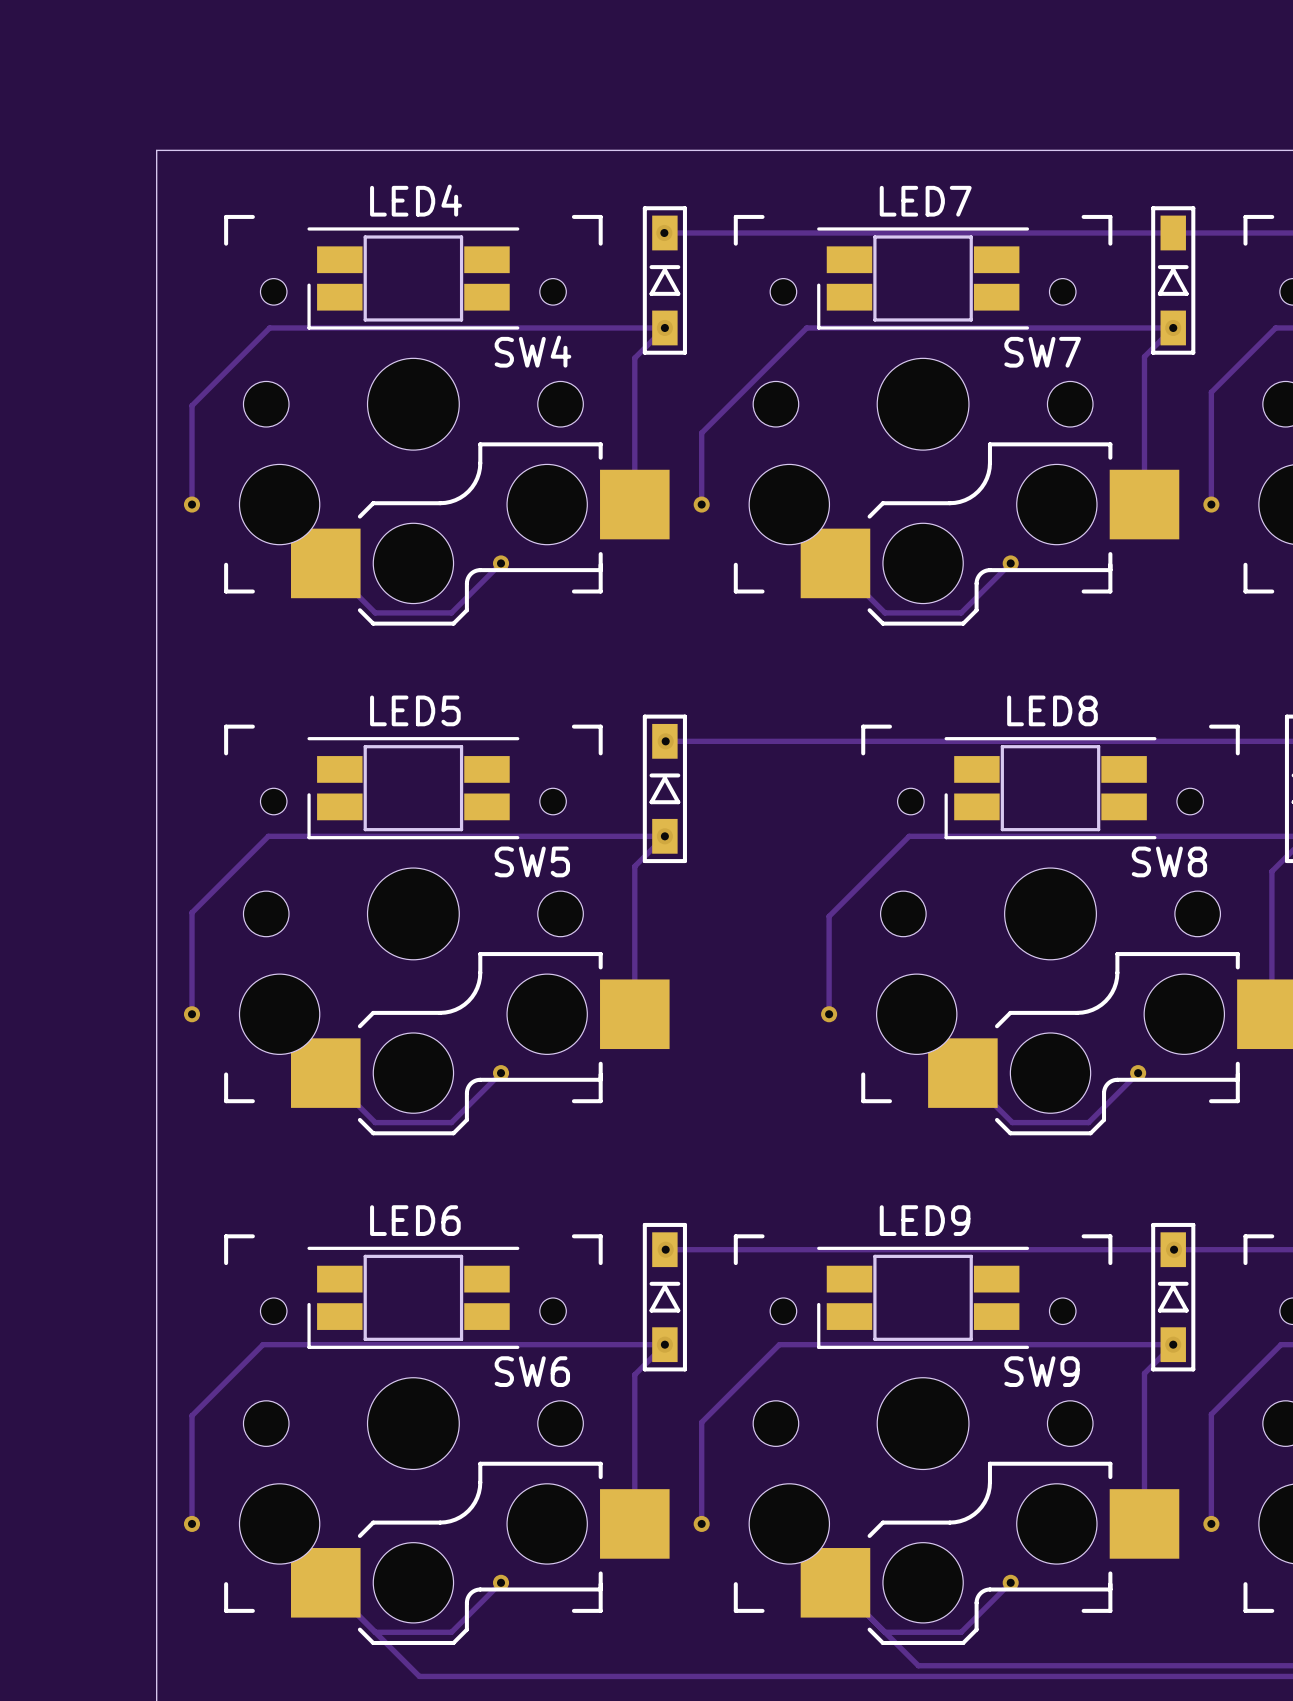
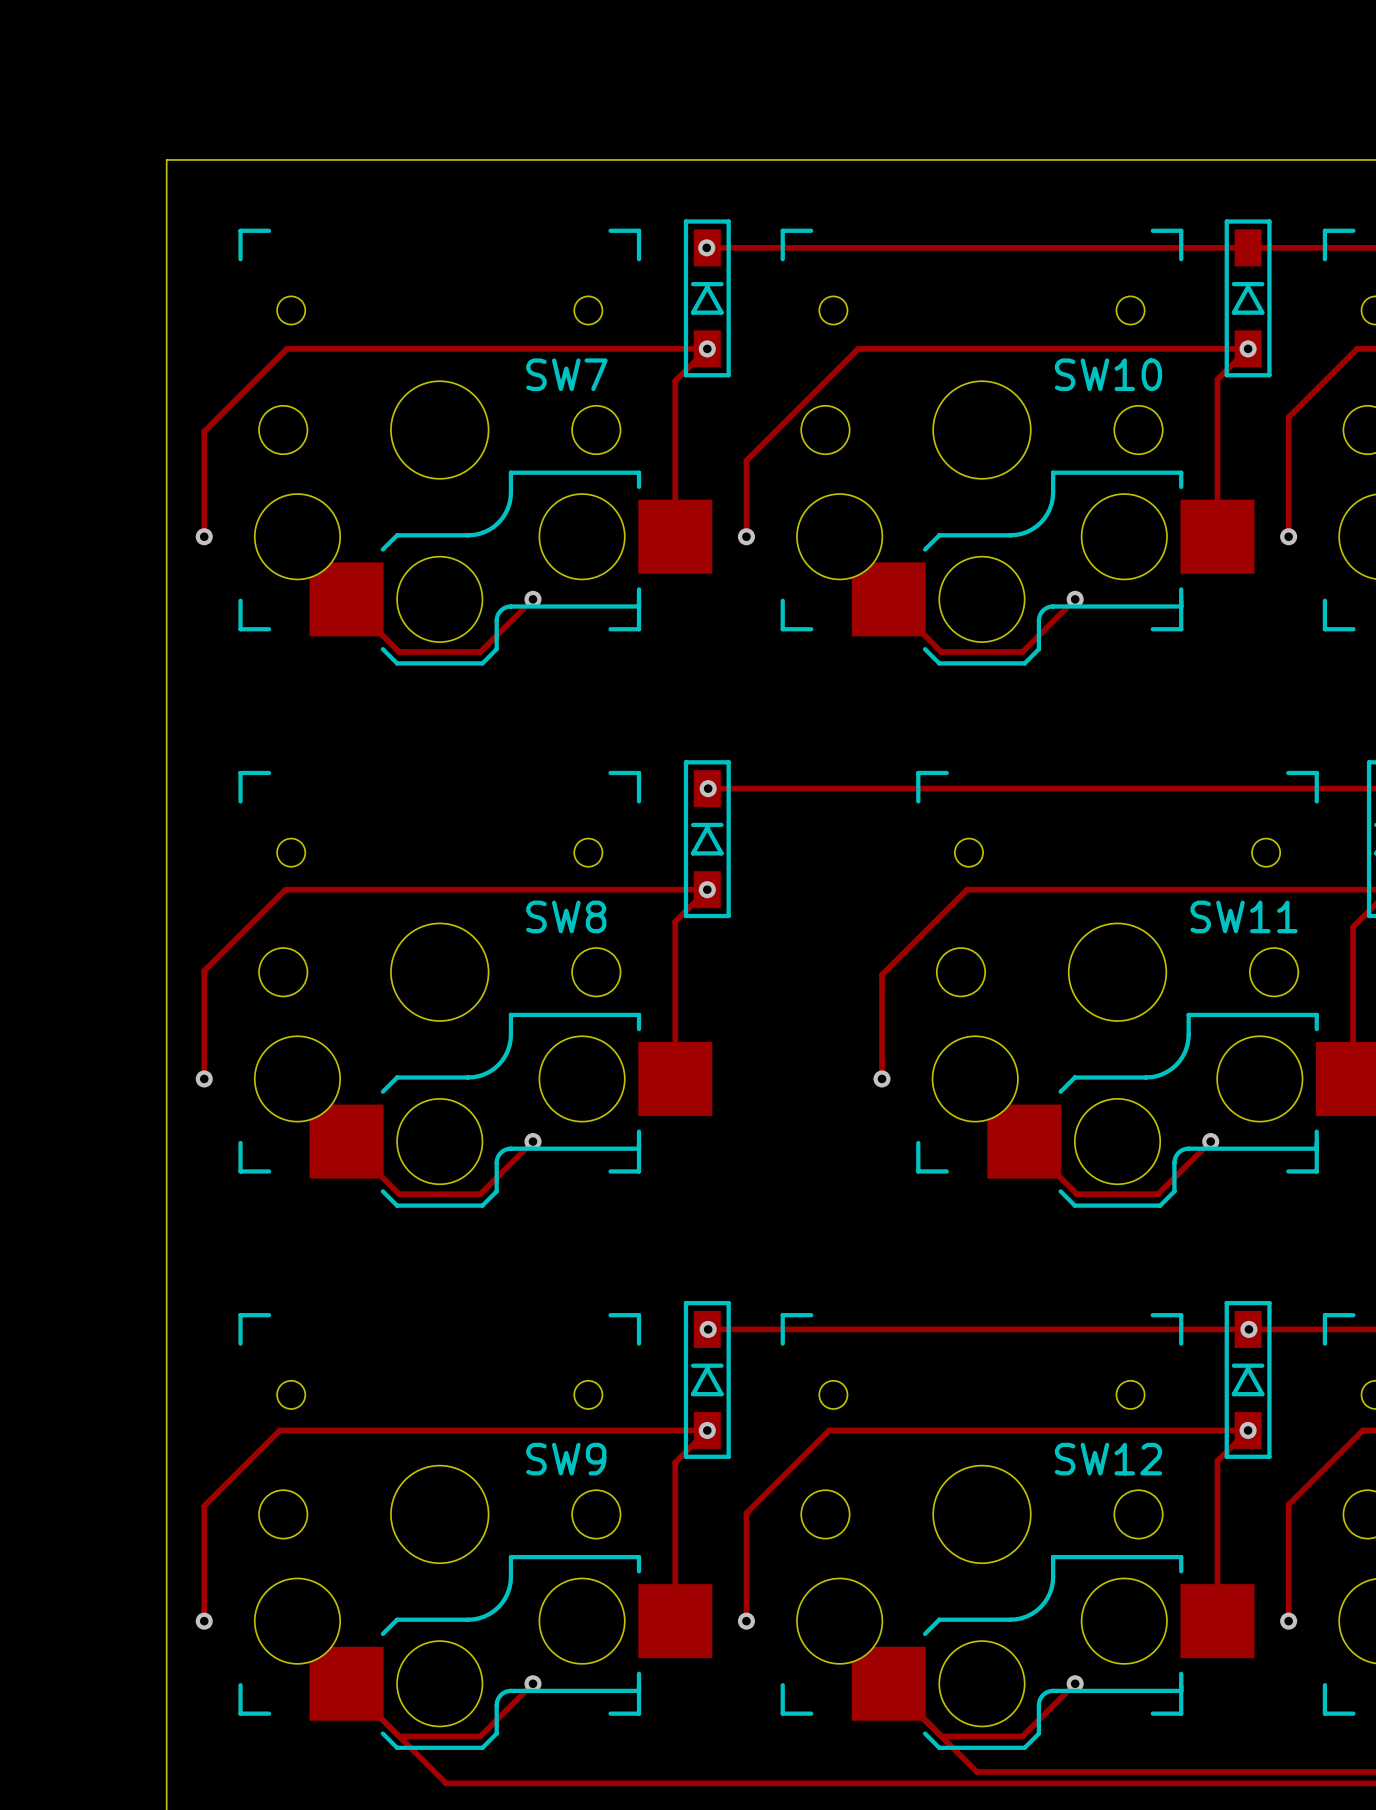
LED4: (413, 278) -> none
LED7: (923, 278) -> none
SW4 name: SW4 (532, 351) -> SW7 (566, 374)
SW7 name: SW7 (1042, 352) -> SW10 (1108, 374)
LED5: (413, 788) -> none
LED8: (1050, 788) -> none
SW5 name: SW5 (532, 861) -> SW8 (566, 916)
SW8 name: SW8 (1169, 861) -> SW11 (1244, 916)
LED6: (413, 1297) -> none
LED9: (923, 1297) -> none
SW6 name: SW6 (532, 1371) -> SW9 (566, 1459)
SW9 name: SW9 (1042, 1371) -> SW12 (1108, 1459)

